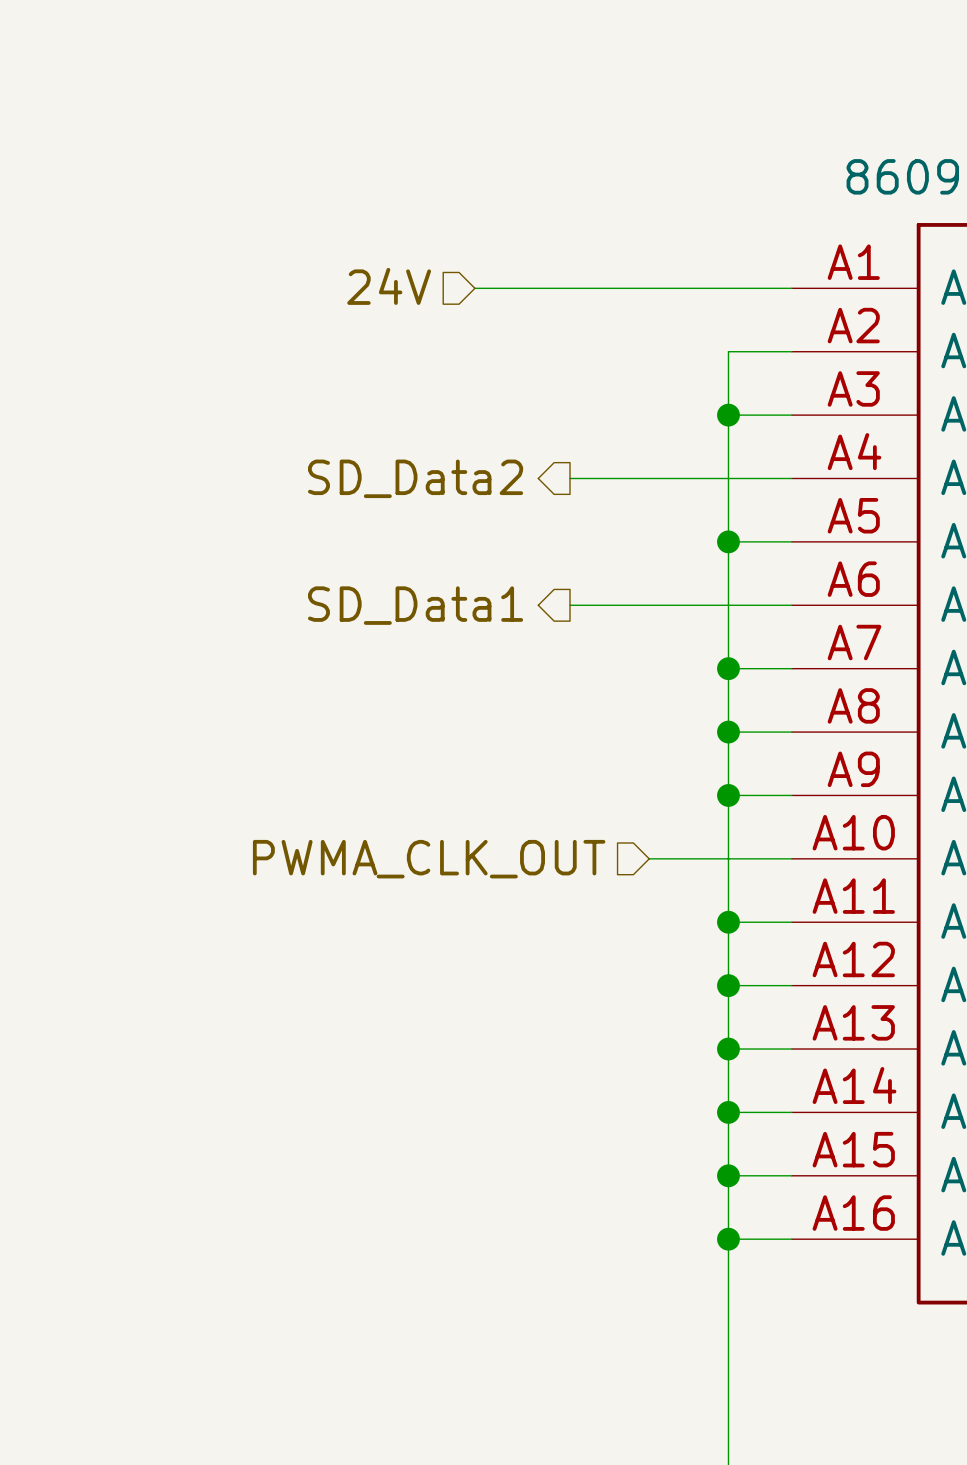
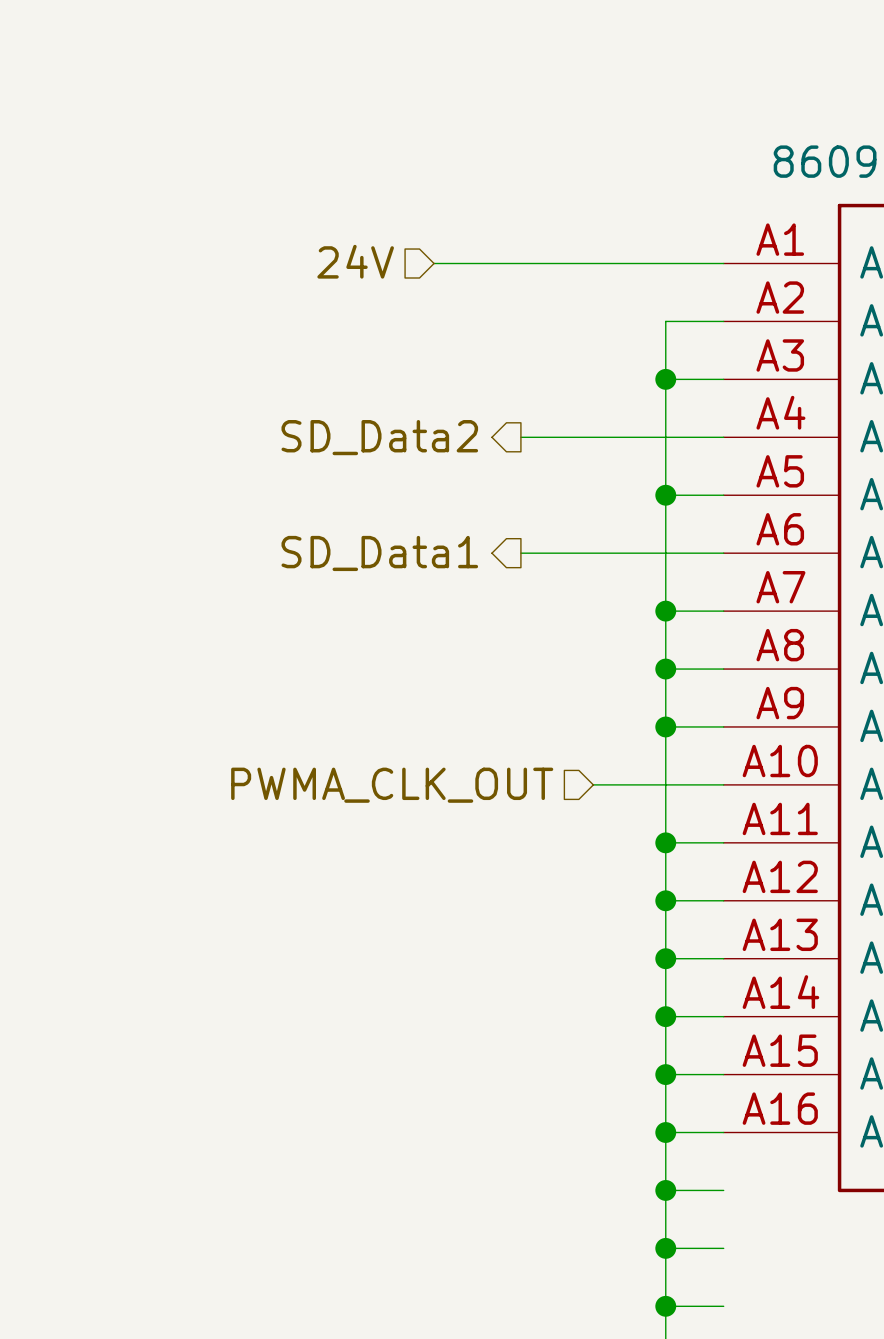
wire: none -> (665, 1190) (723, 1190)
junction: none -> (665, 1190)
wire: none -> (665, 1248) (723, 1248)
junction: none -> (665, 1248)
wire: none -> (665, 1306) (723, 1306)
junction: none -> (665, 1306)

